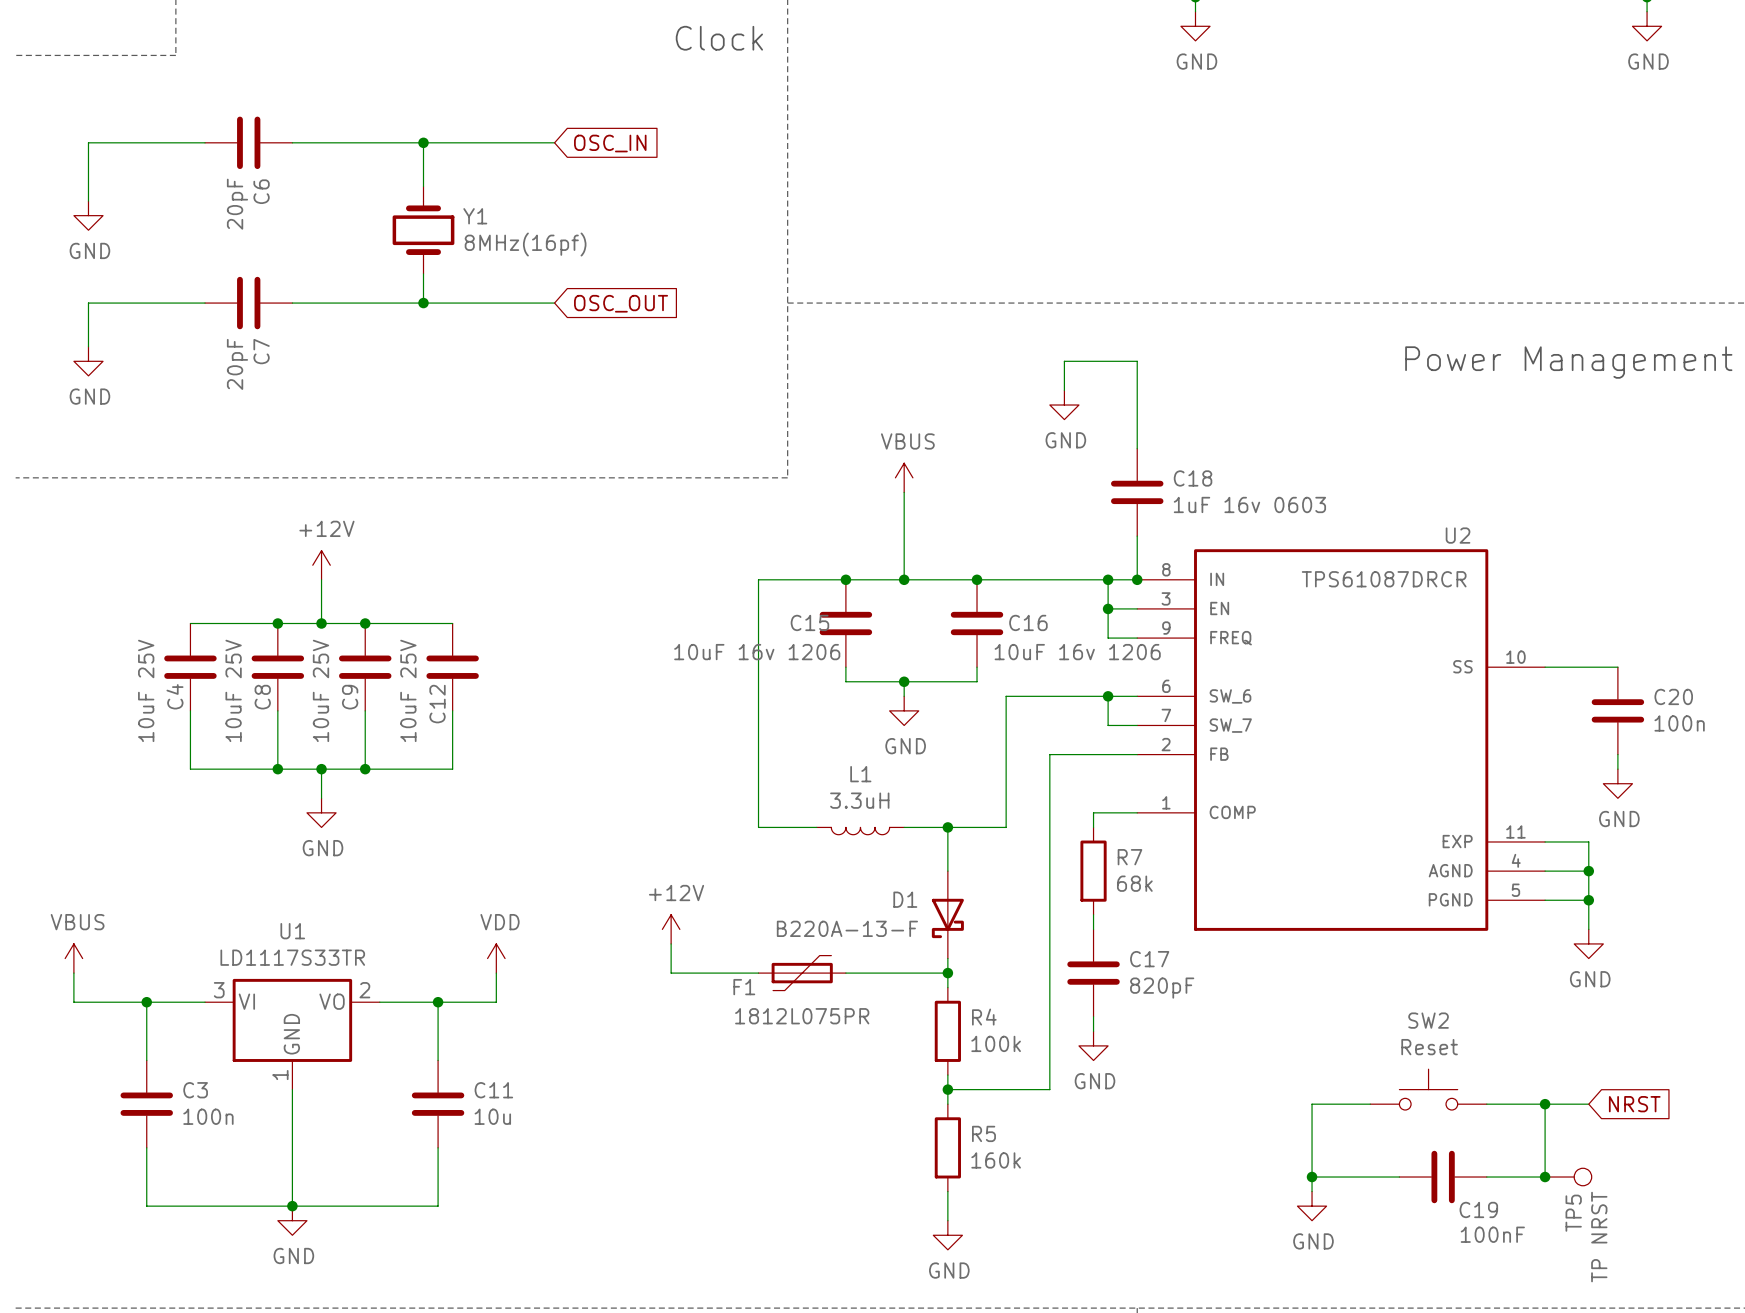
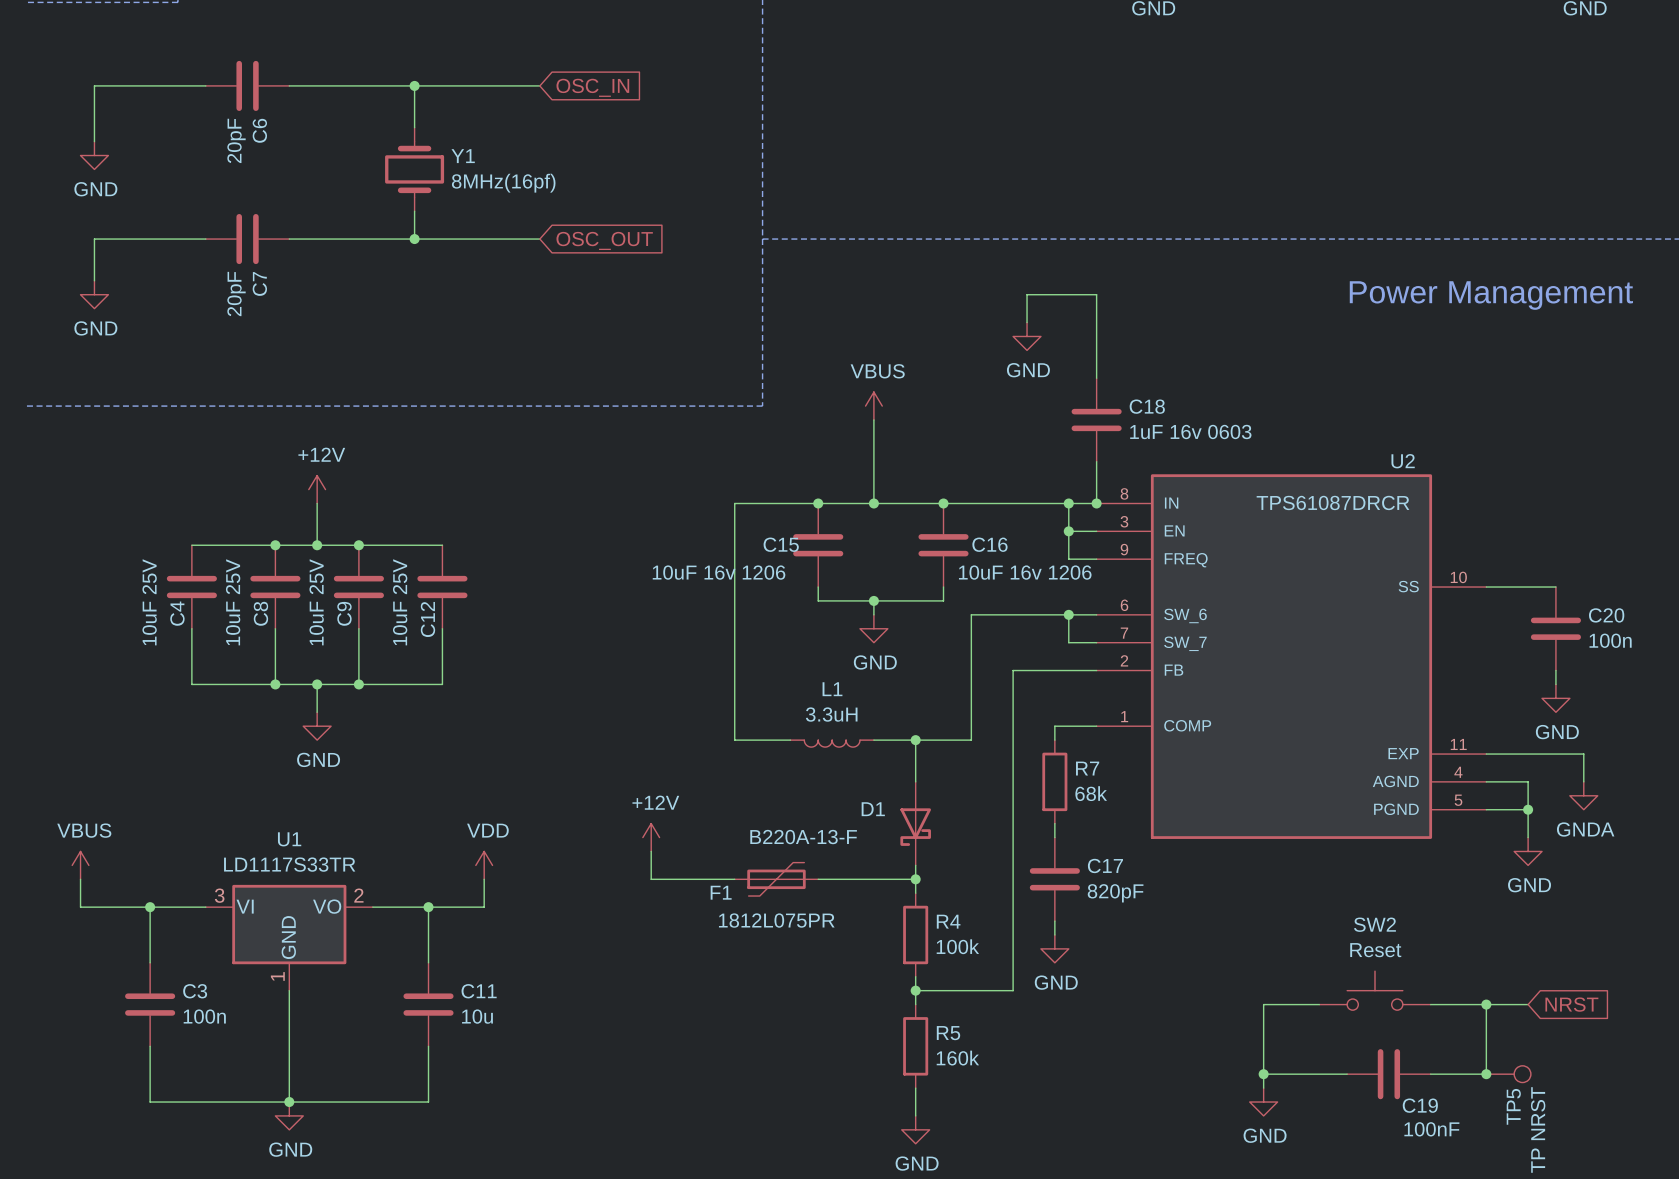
wire: (1588, 841) (1588, 871) -> (1528, 754) (1583, 754) (1583, 781)
junction: (1588, 871) -> none
power symbol: none -> GNDA (1583, 795)

